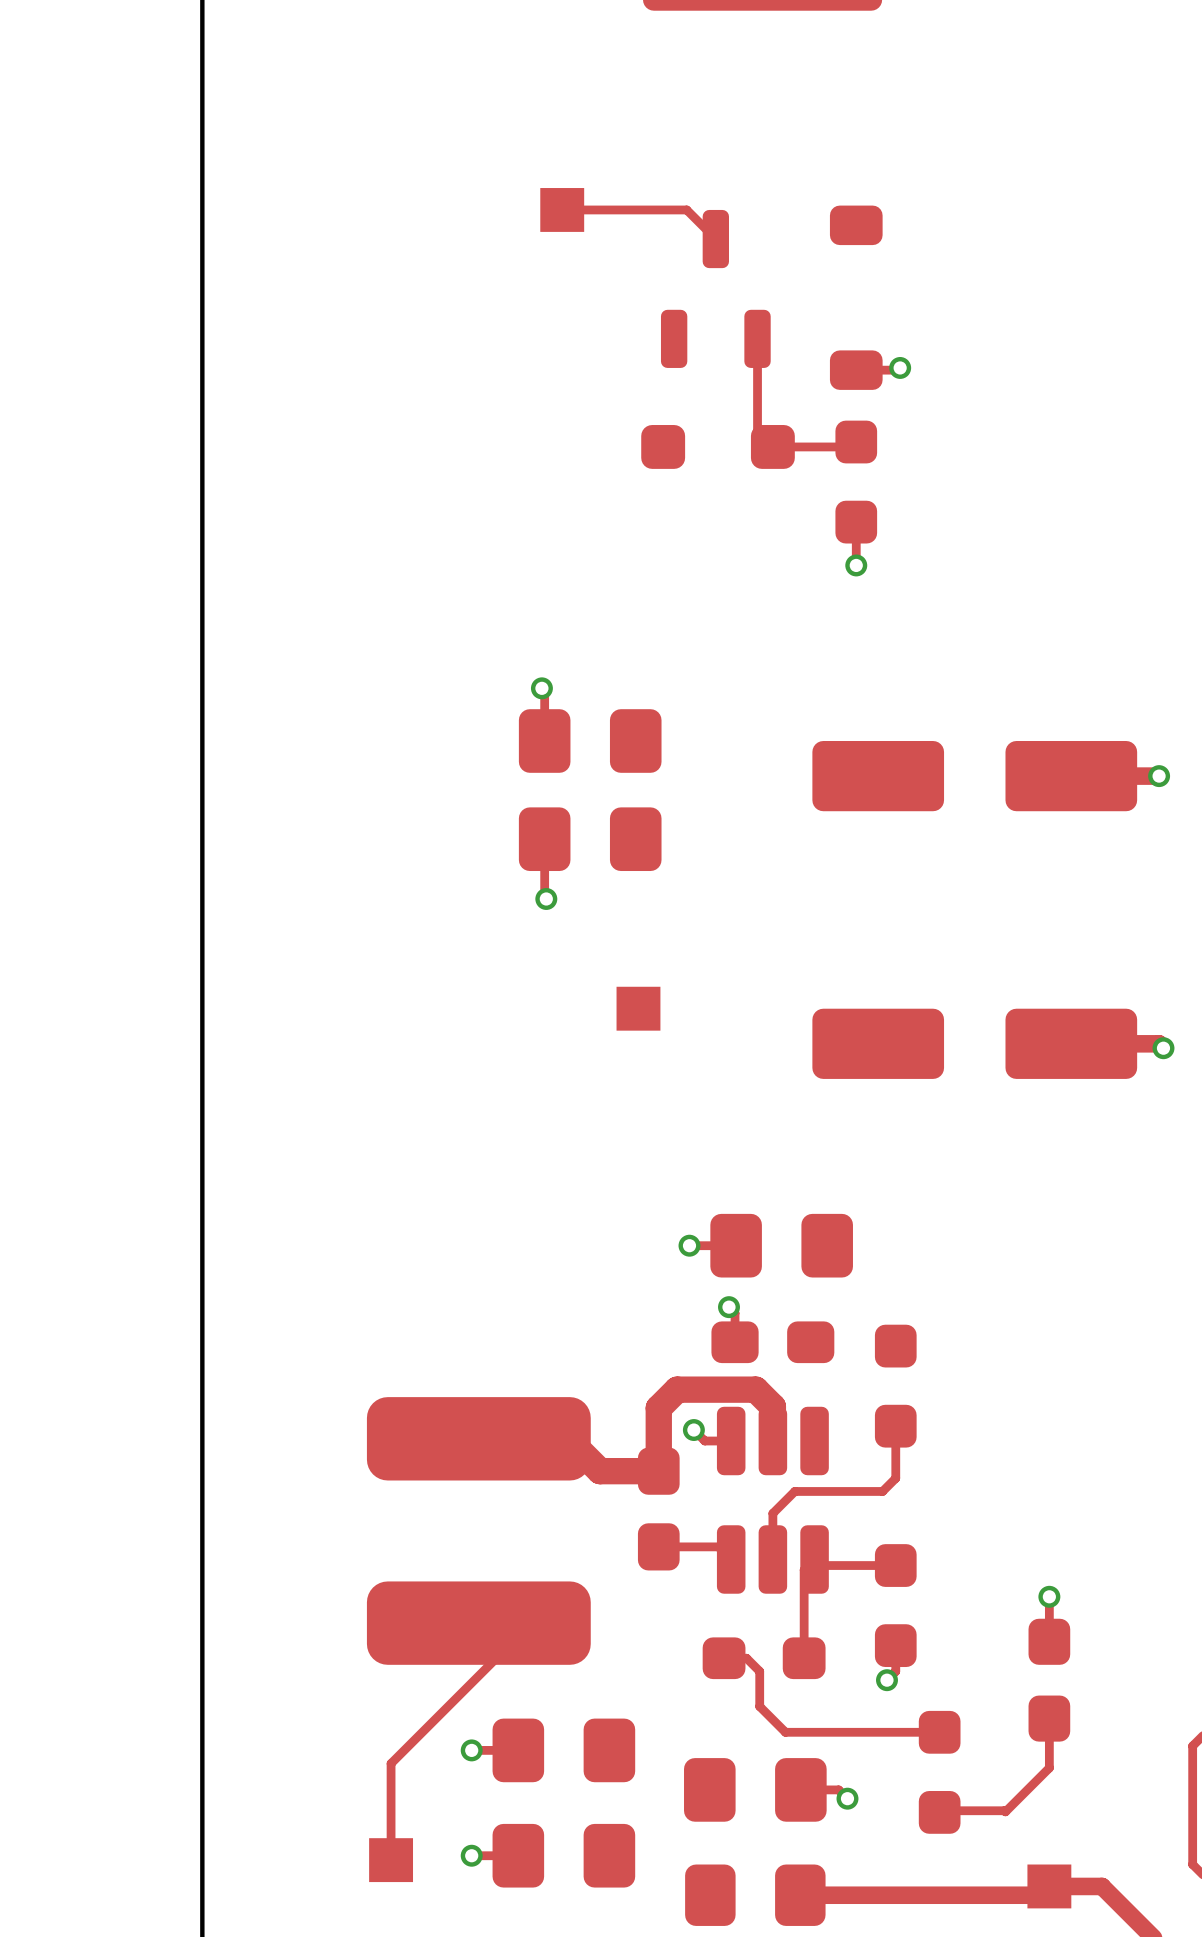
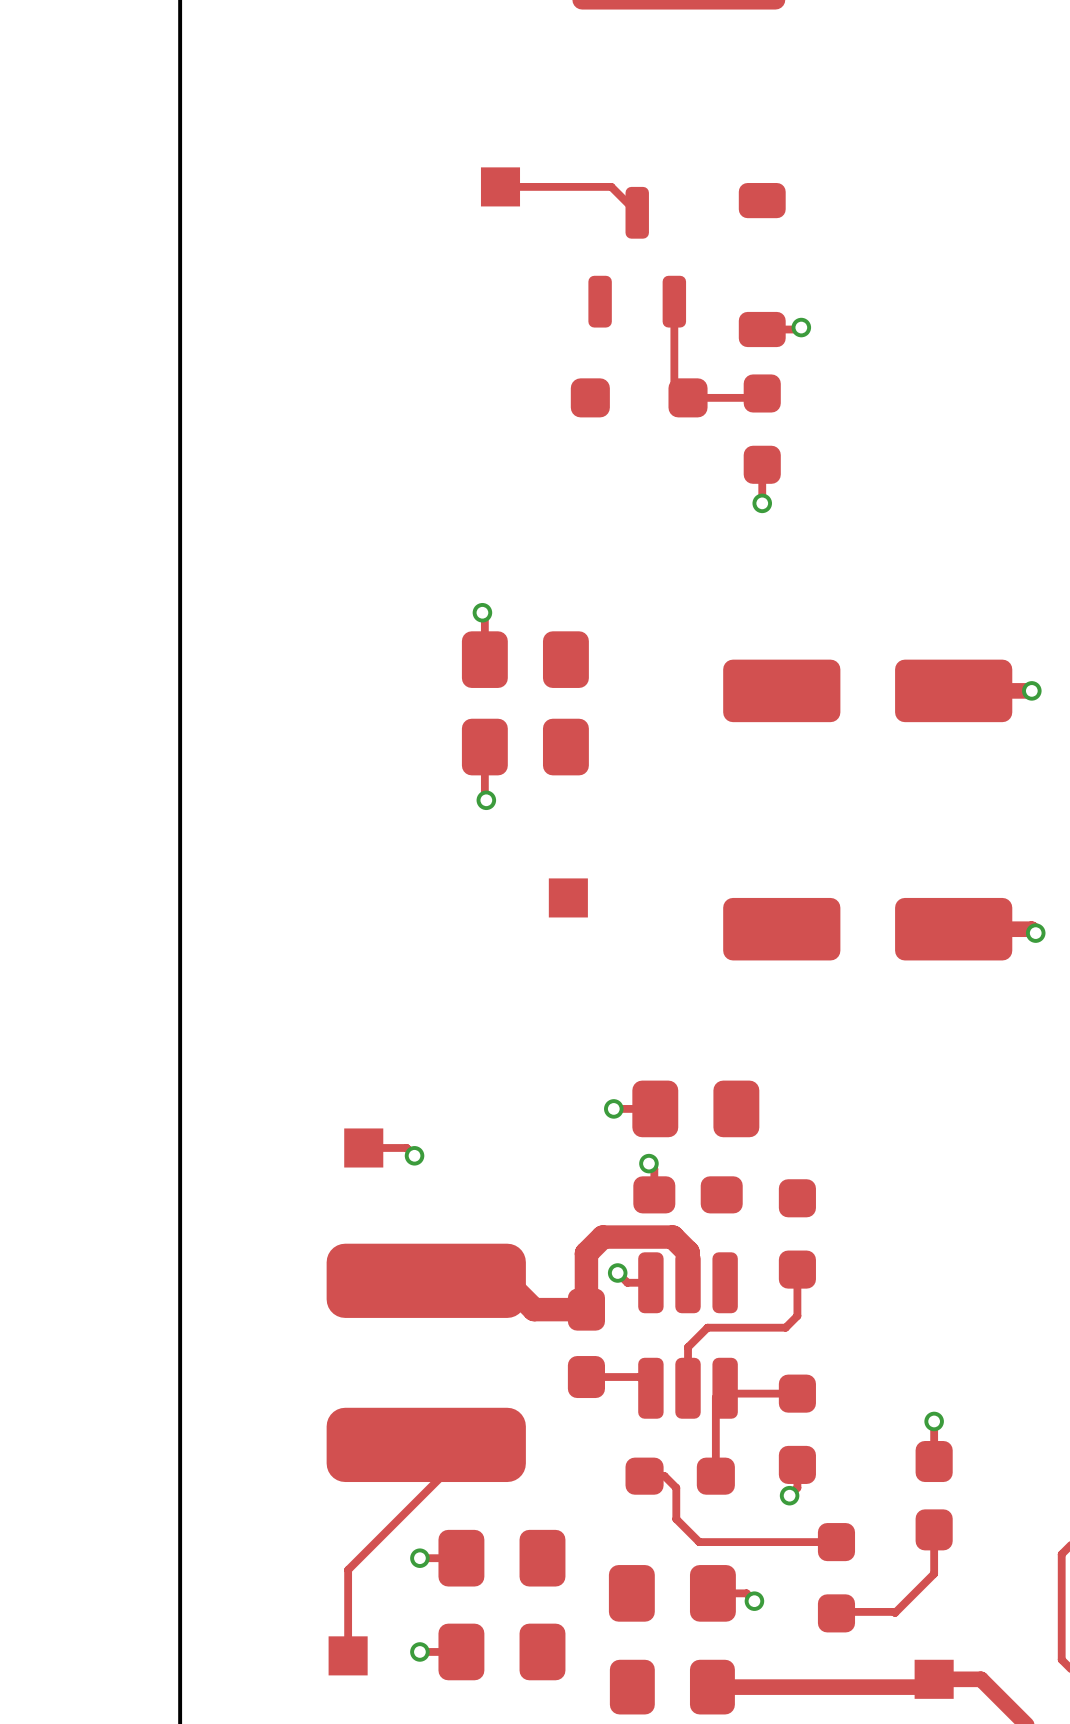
top track: none -> (363, 1147) (406, 1147) (414, 1155)
part: none -> (363, 1147)
via: none -> (414, 1155)

